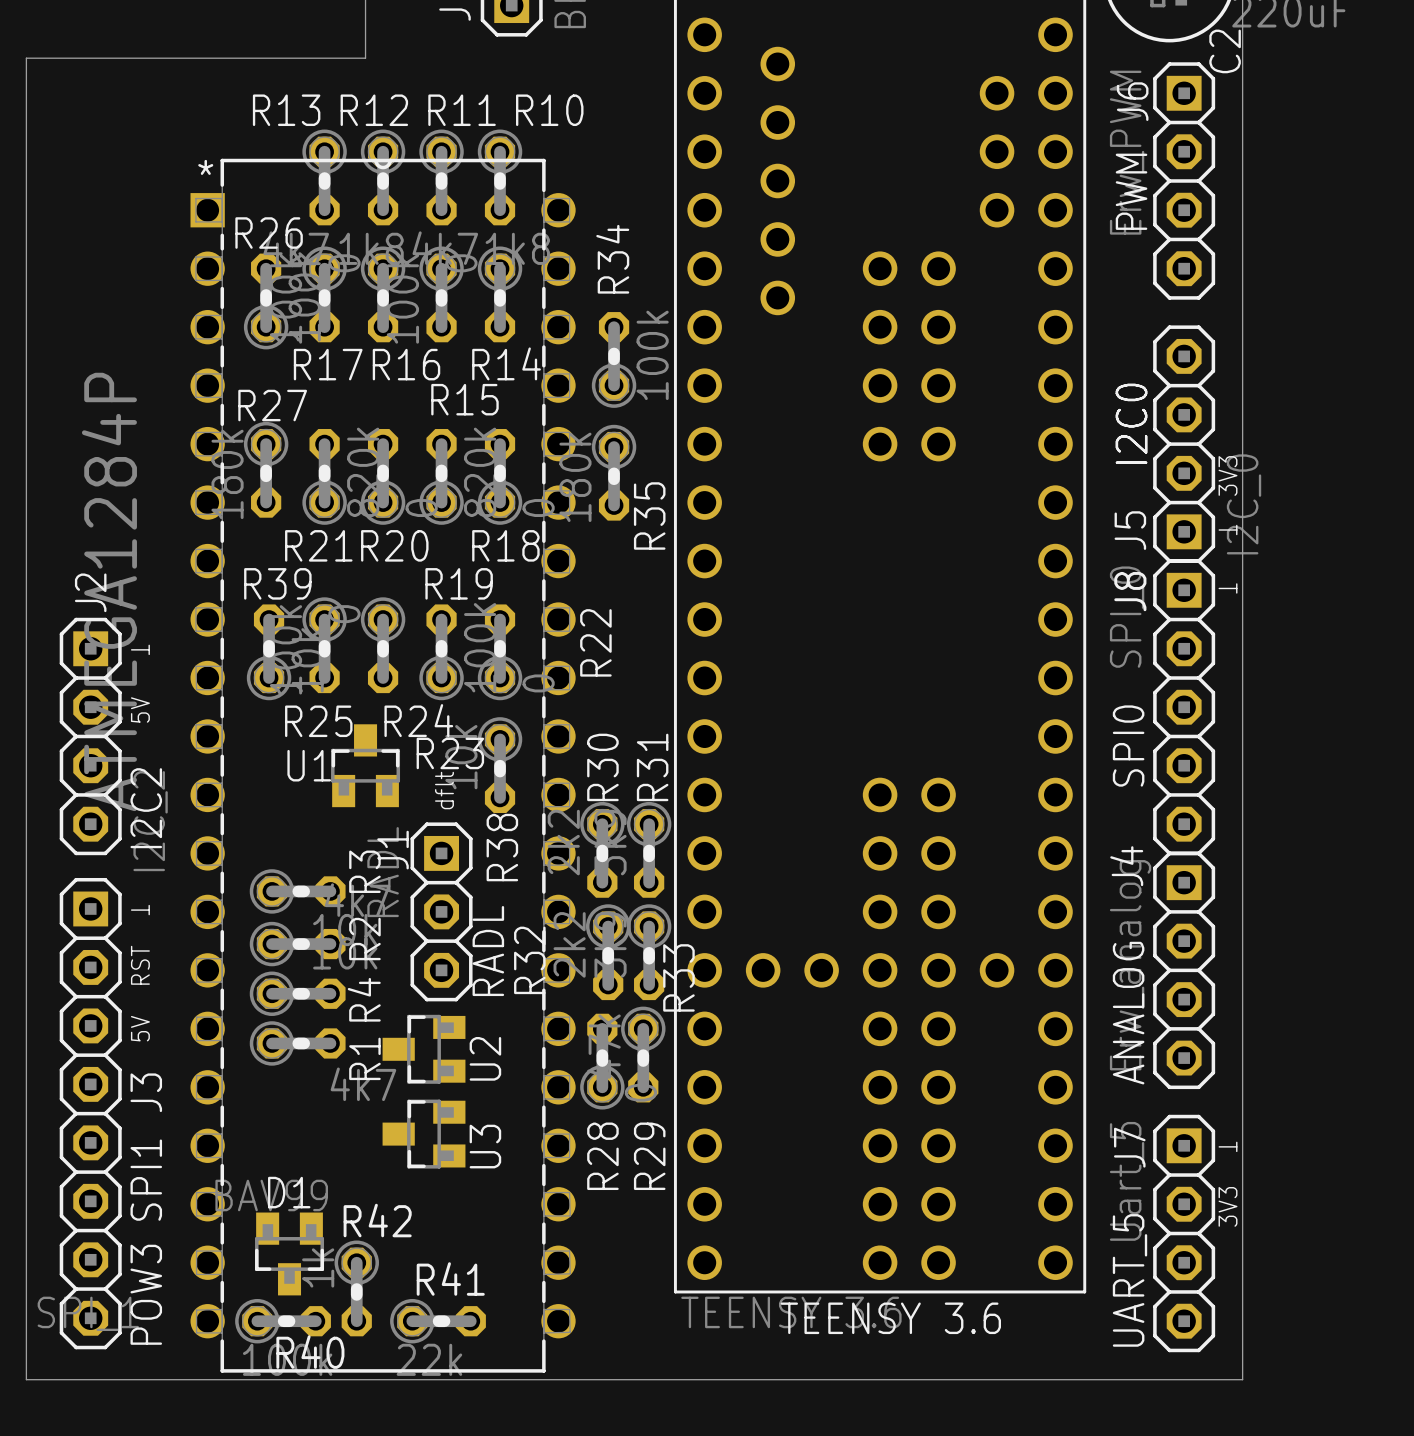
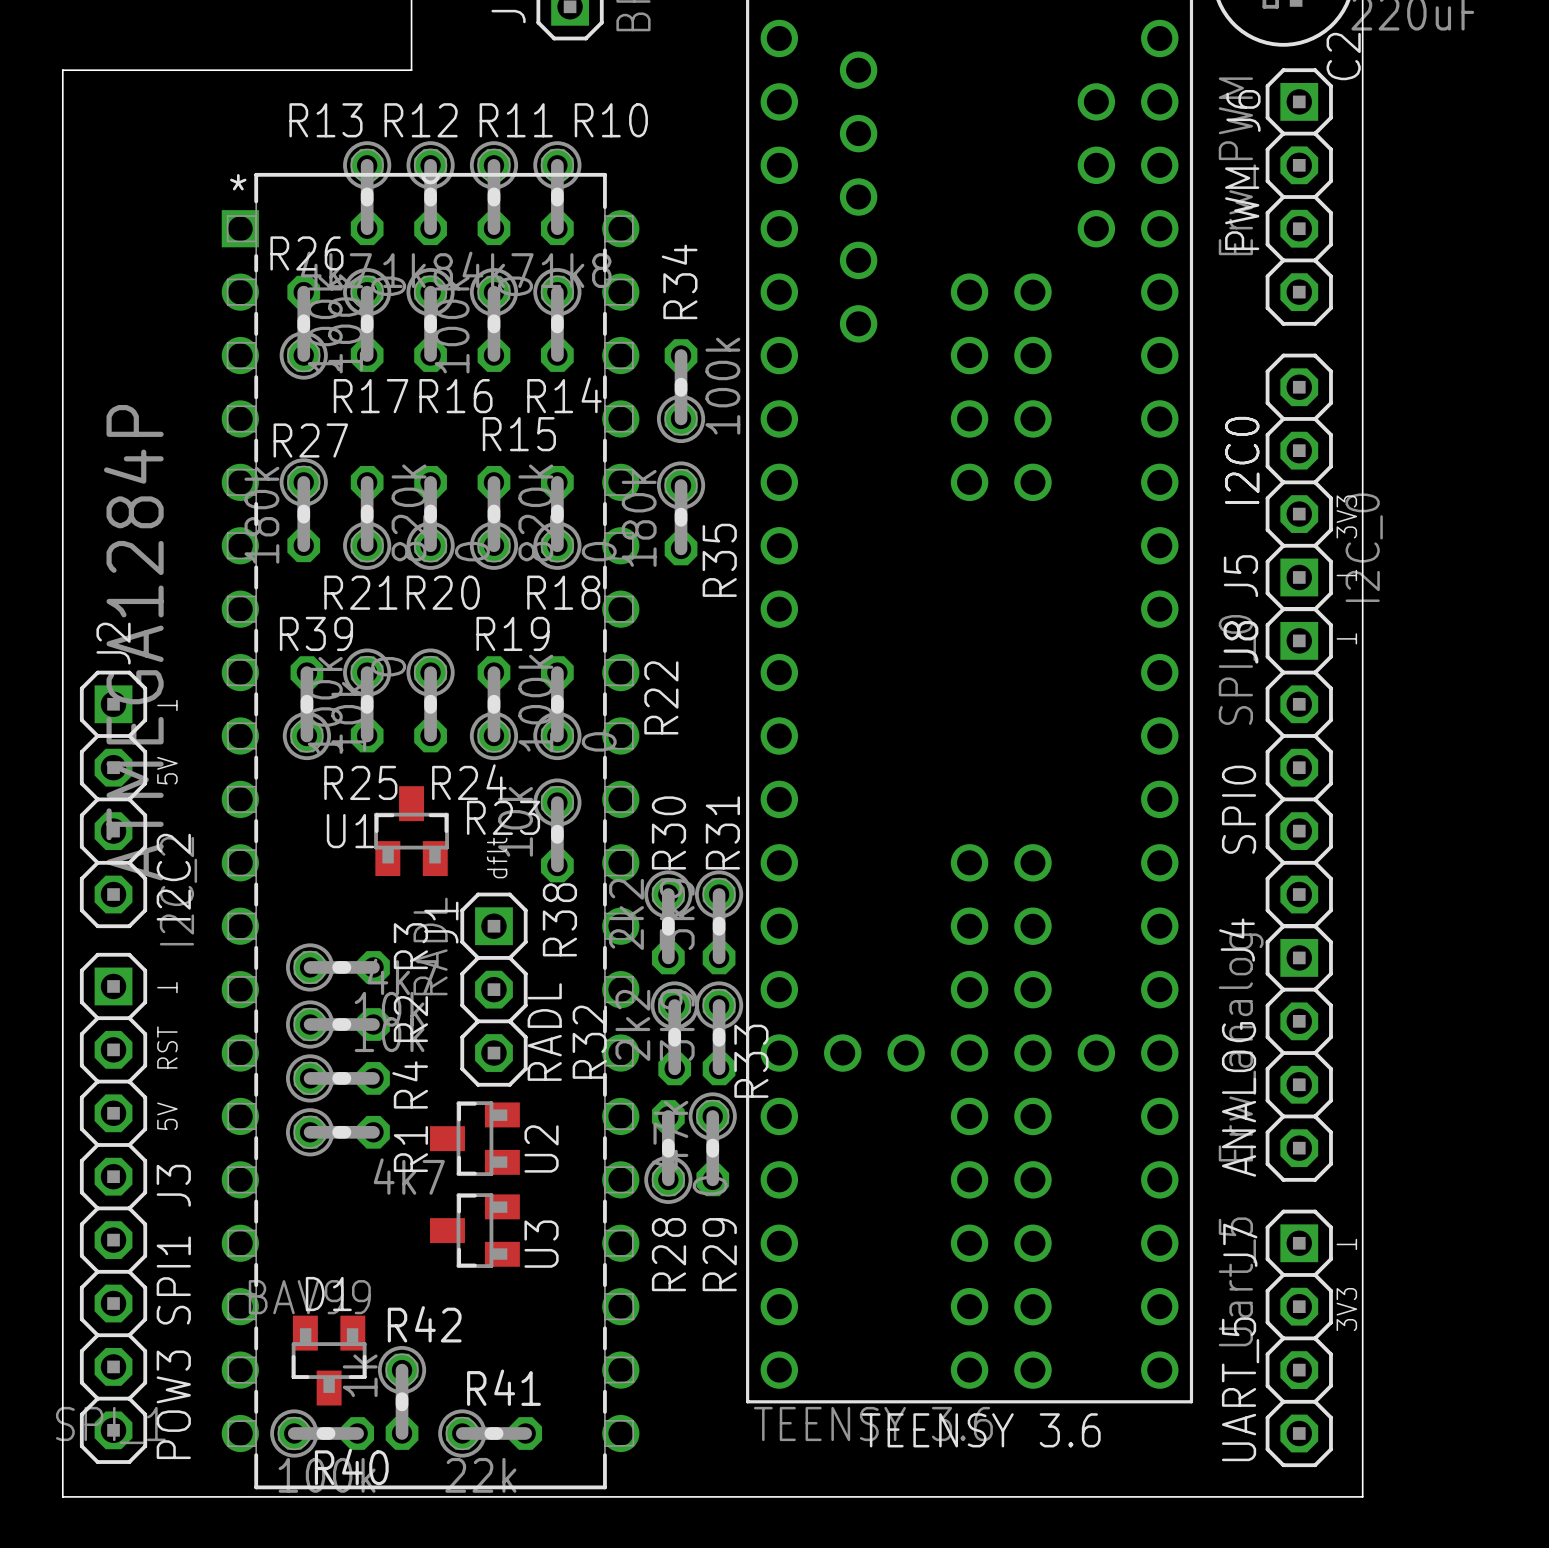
board edge: (365, 58) (26, 58) (26, 1379) (43, 1379) -> (411, 63) (411, 70) (62, 70) (62, 1496)

